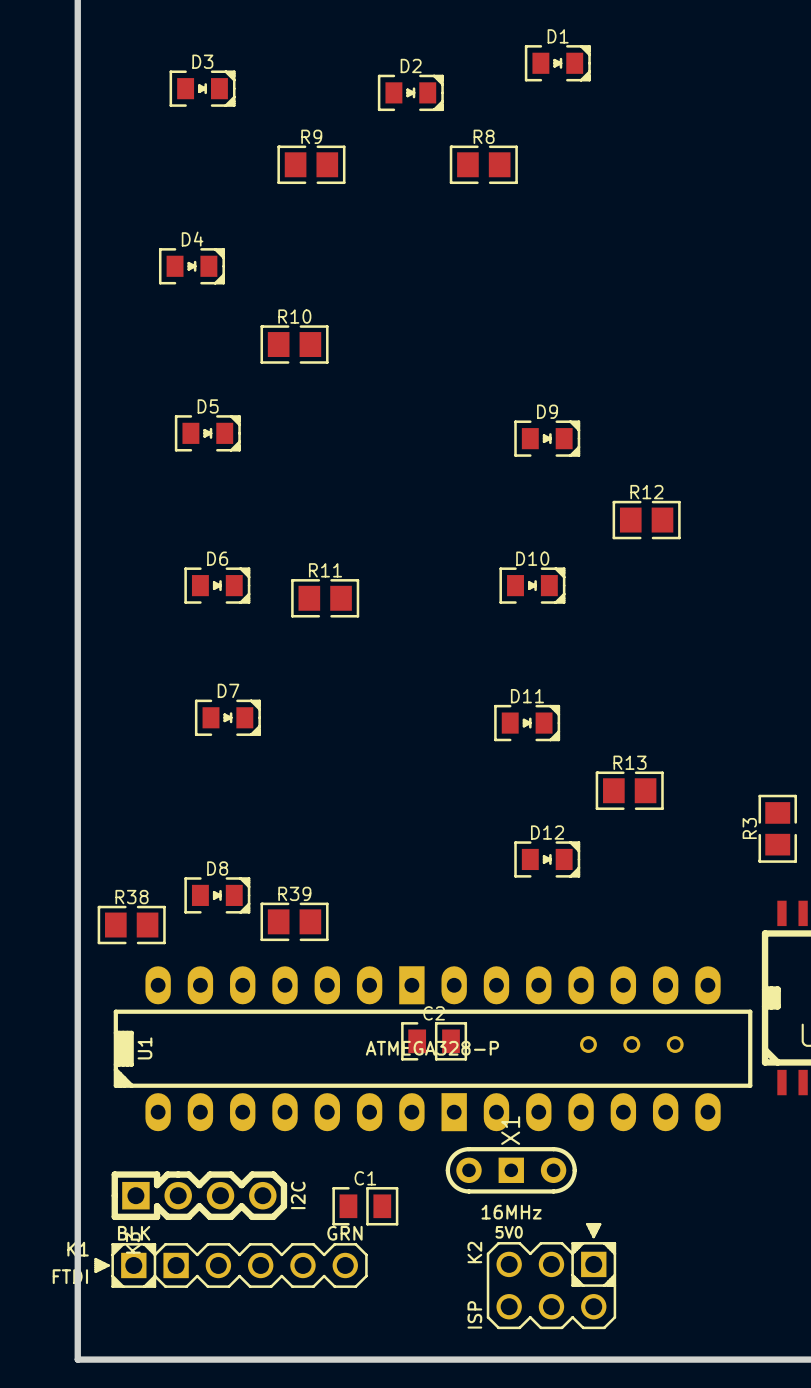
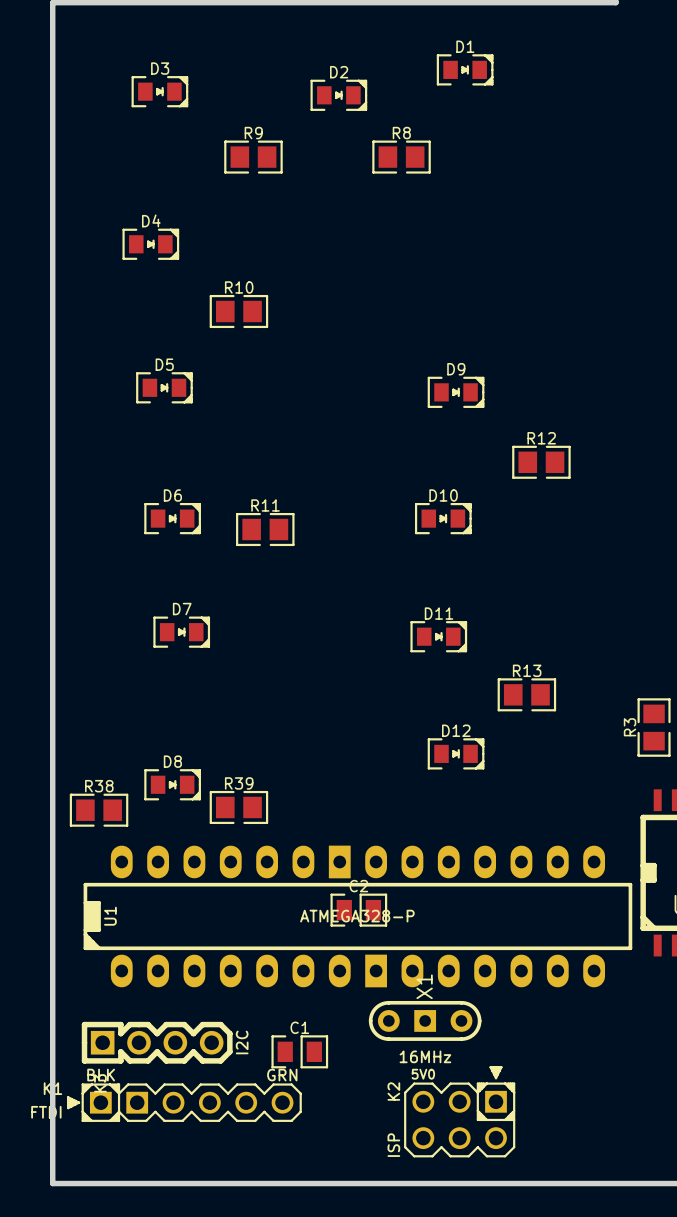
part: (588, 1044) -> none
part: (631, 1044) -> none
part: (675, 1044) -> none

